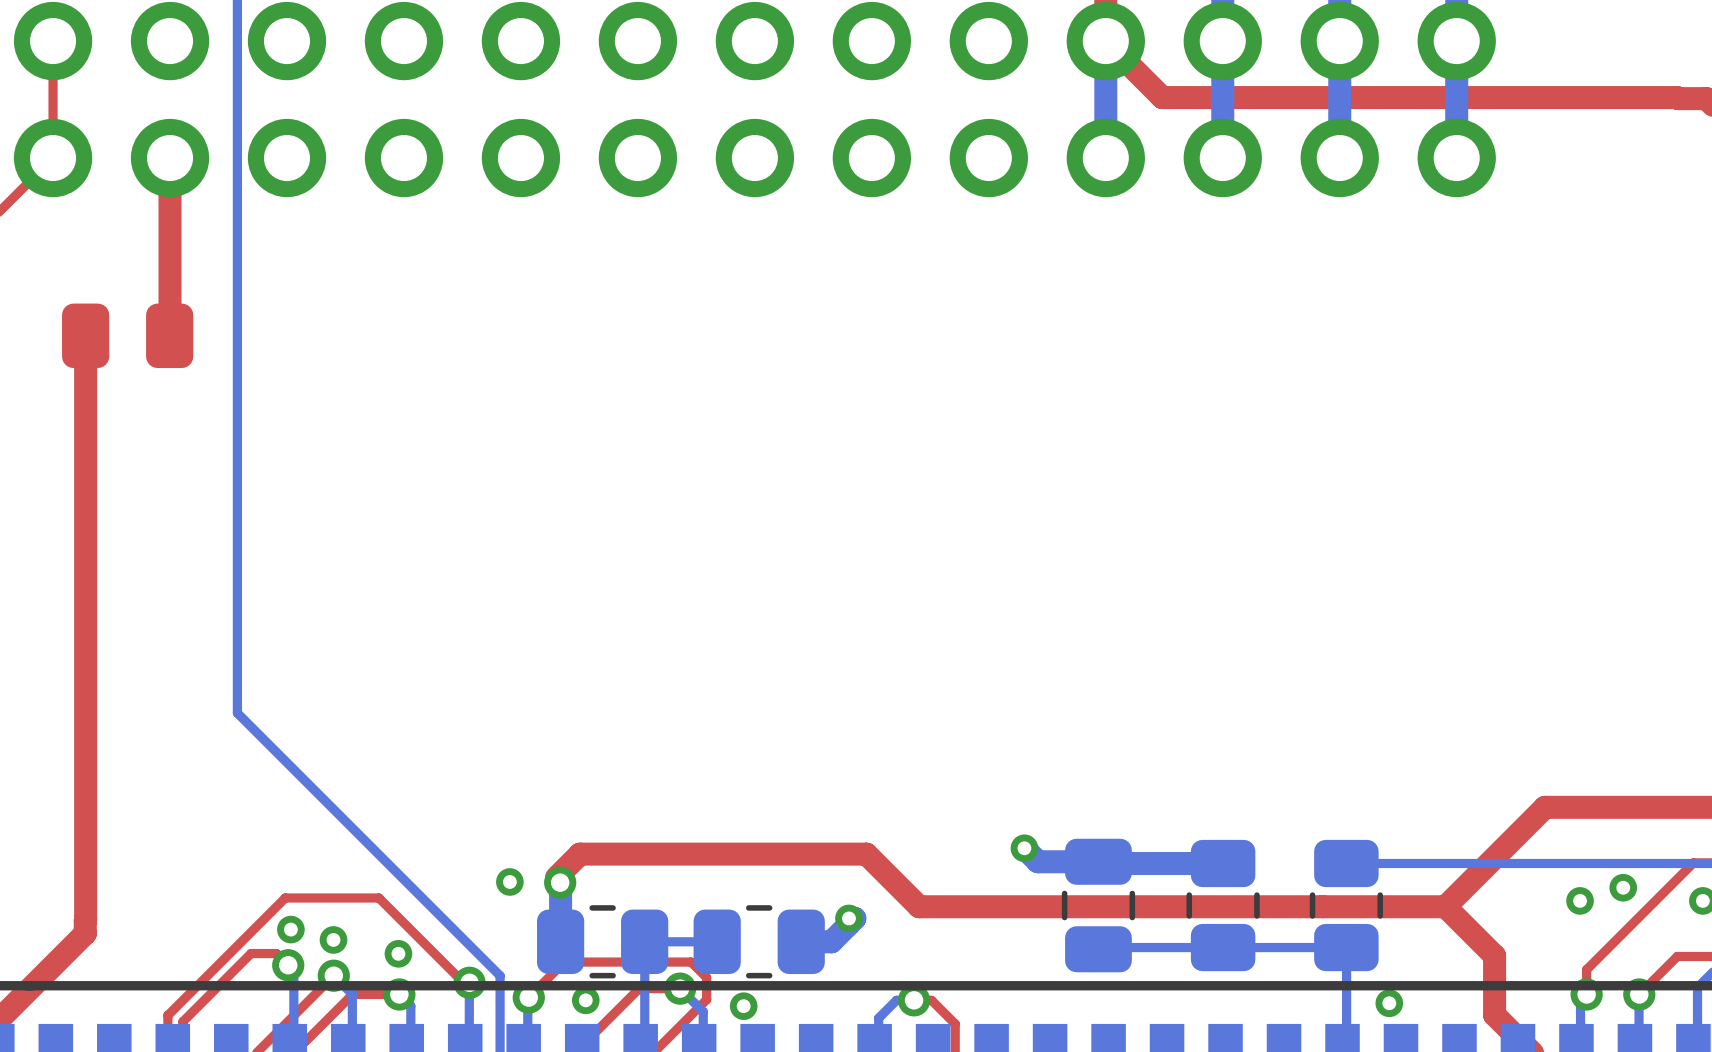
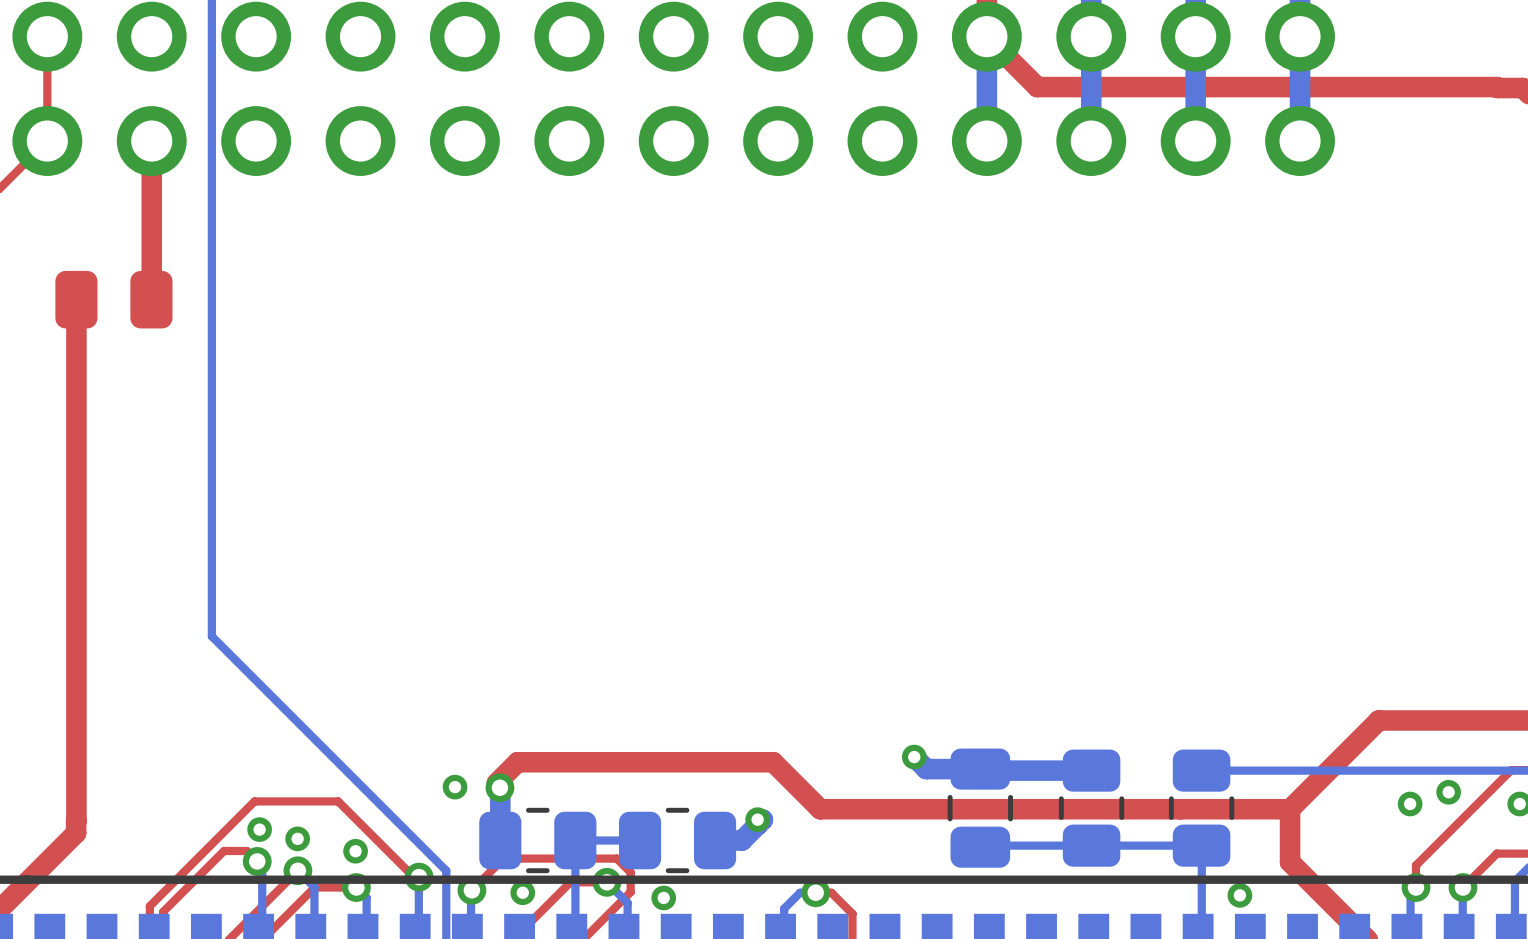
top track: (1445, 906) (1494, 955) (1494, 1014) -> (1290, 809) (1290, 862) (1333, 905)

